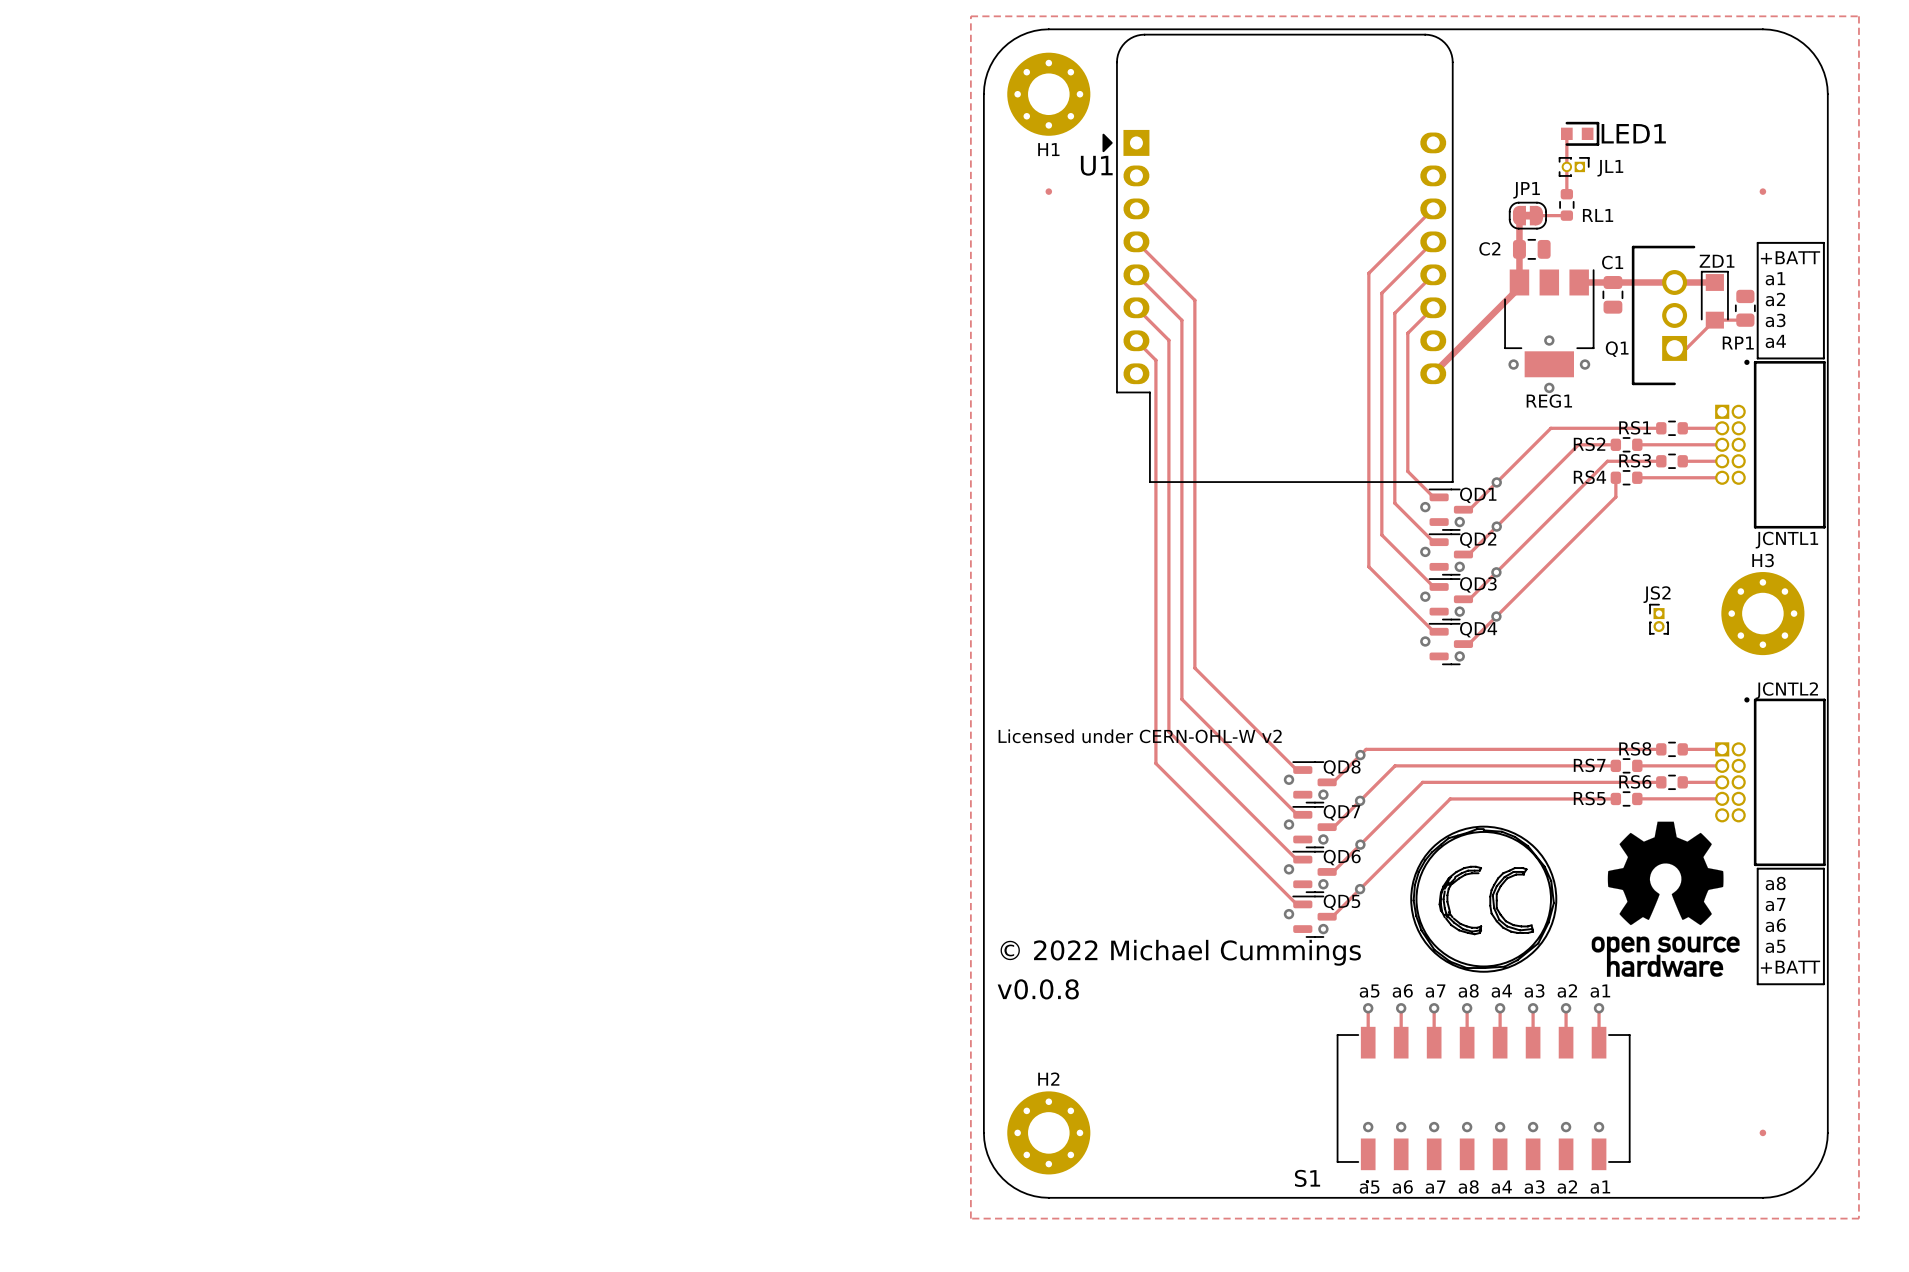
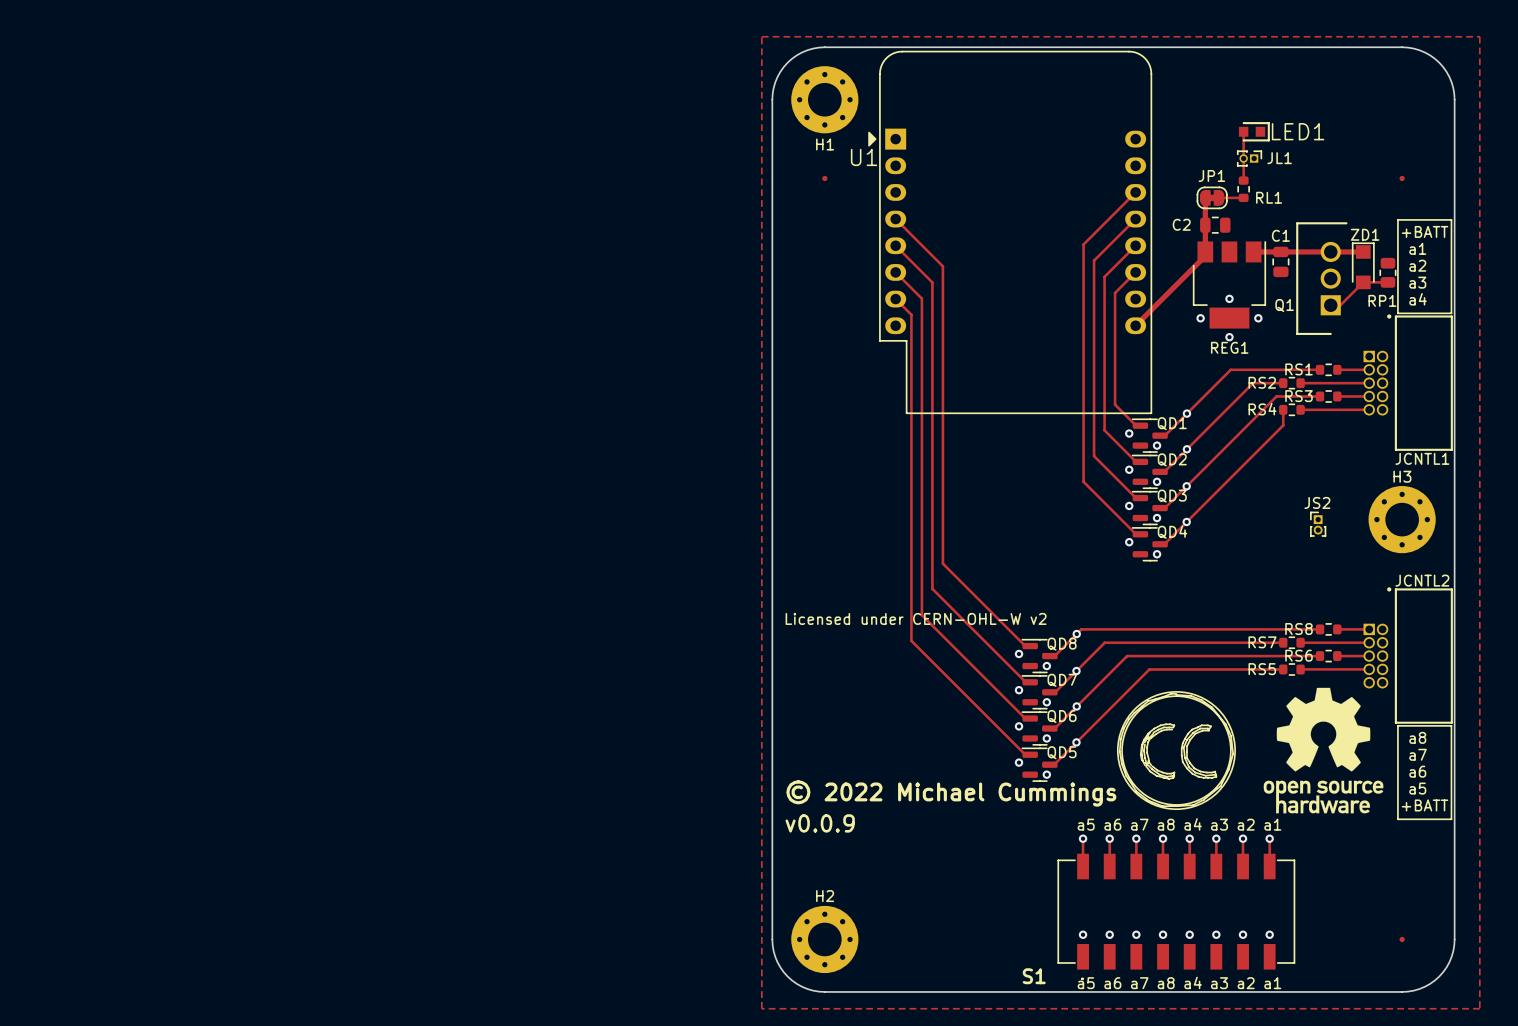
text: v0.0.8 (1038, 989) -> v0.0.9 (820, 823)

